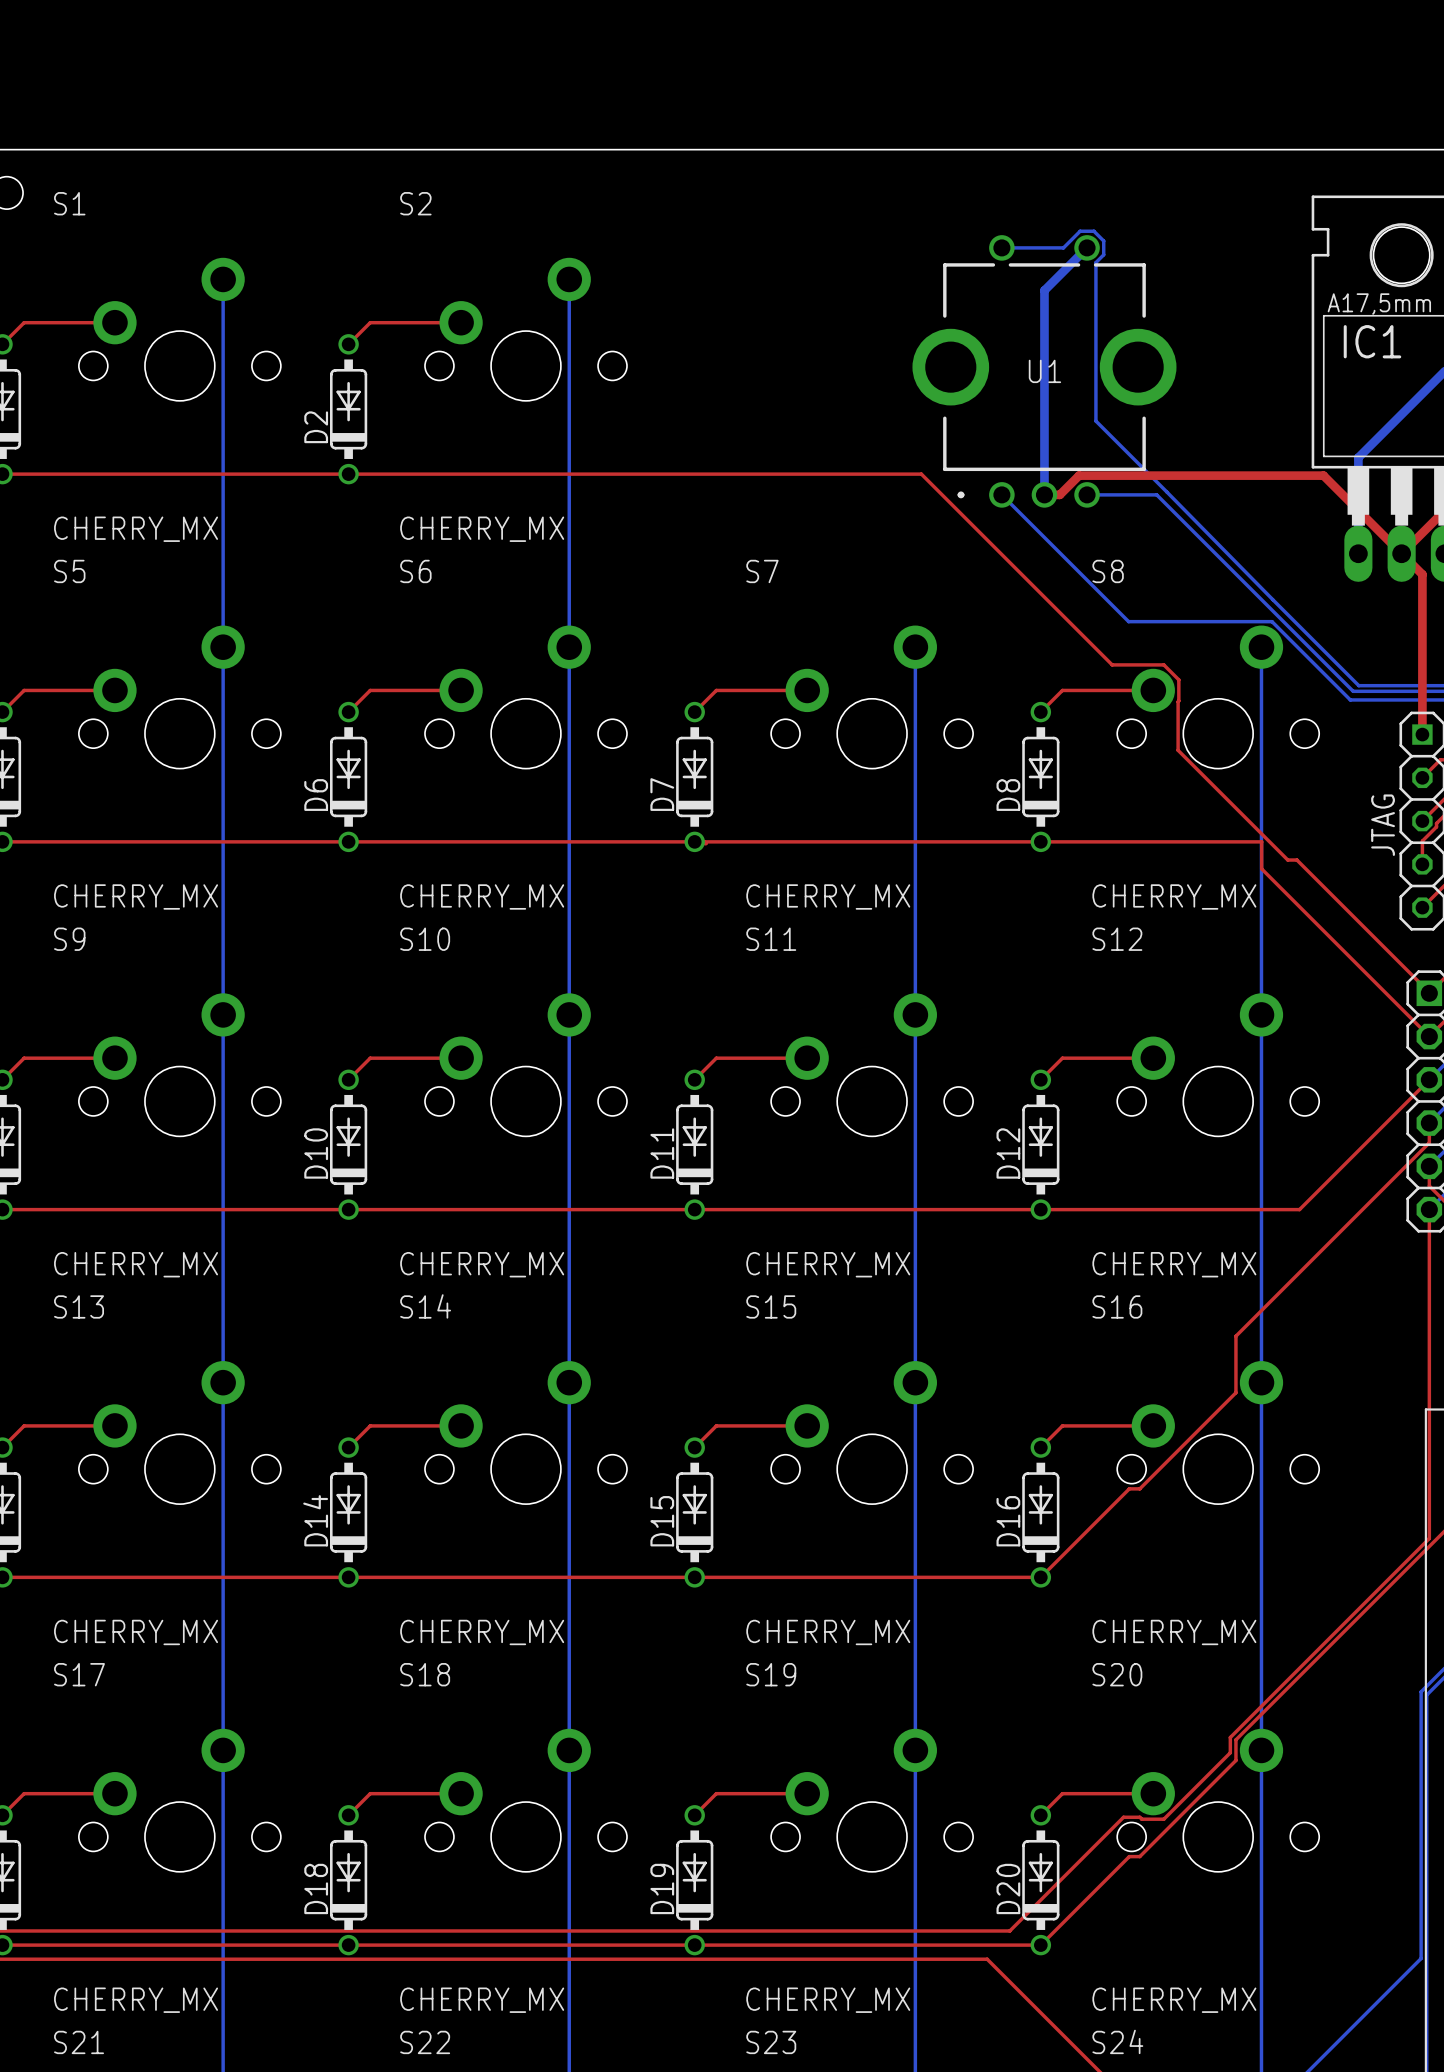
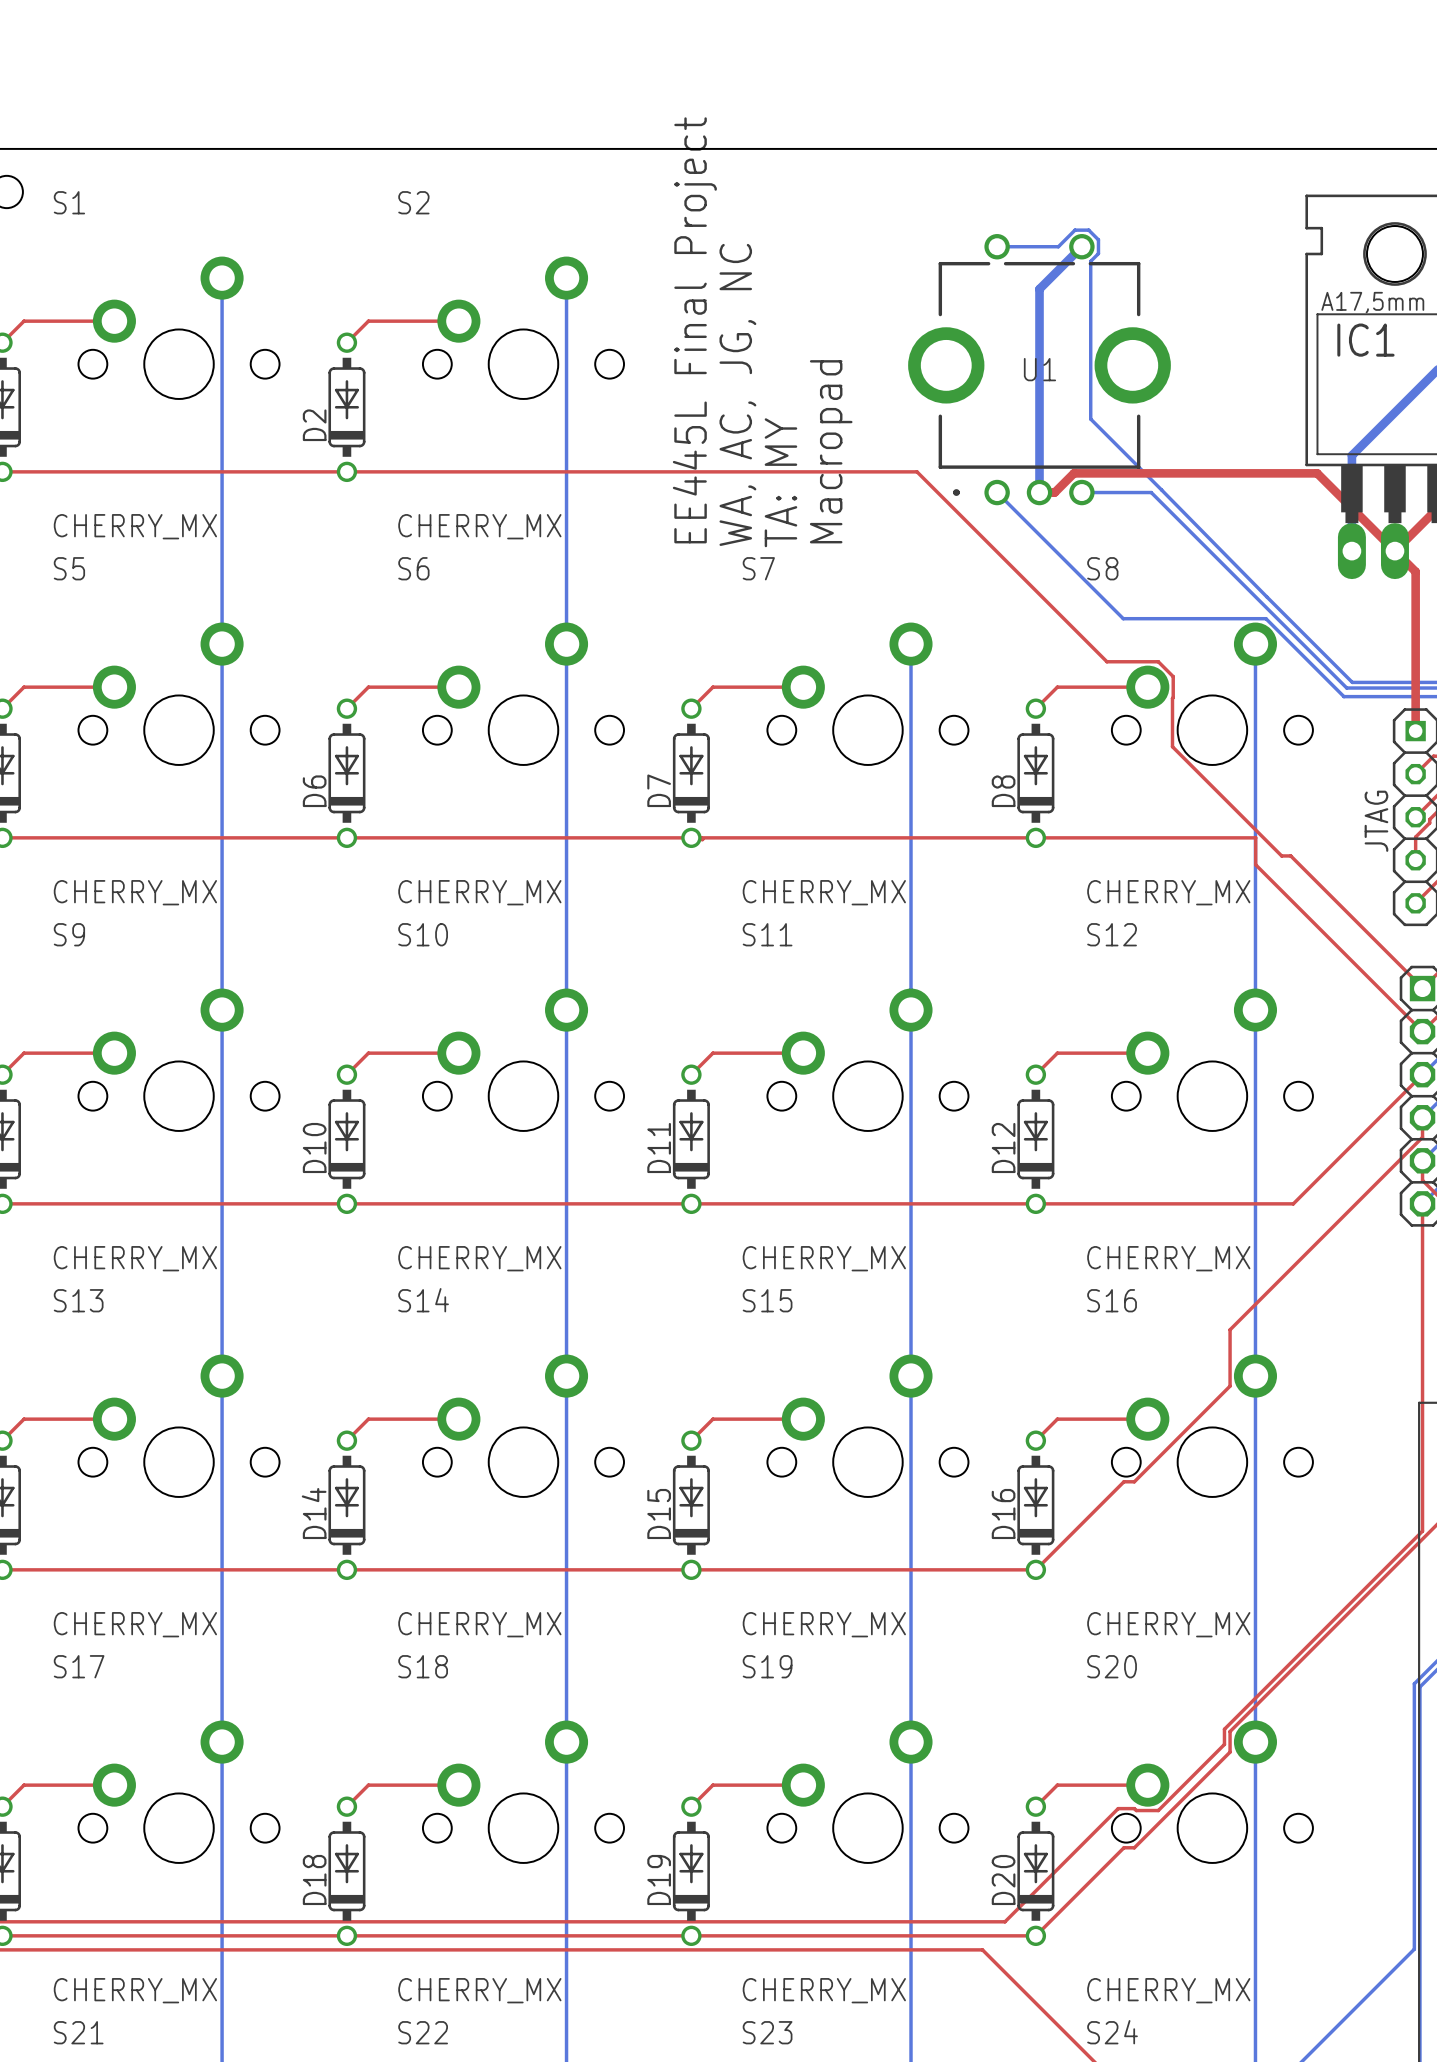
text: none -> EE445L Final Project (694, 330)
text: none -> WA, AC, JG, NC (737, 394)
text: none -> Macropad (831, 451)
text: none -> TA: MY (780, 482)

